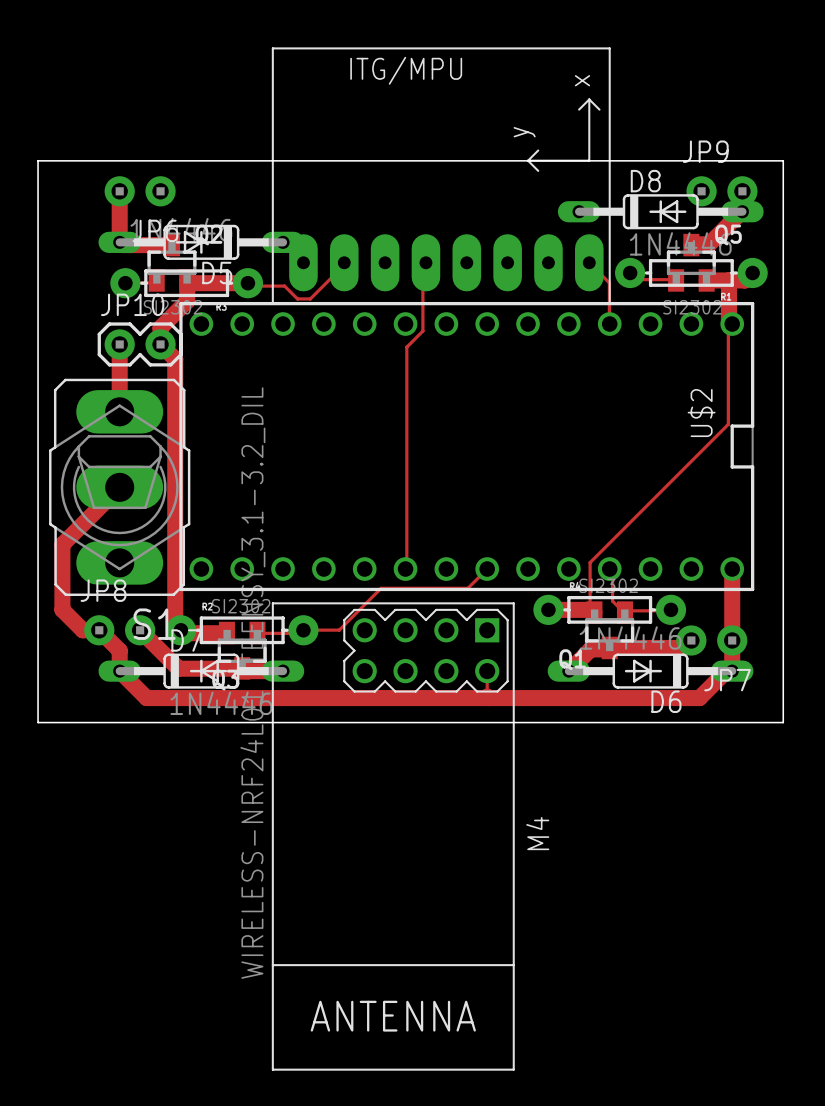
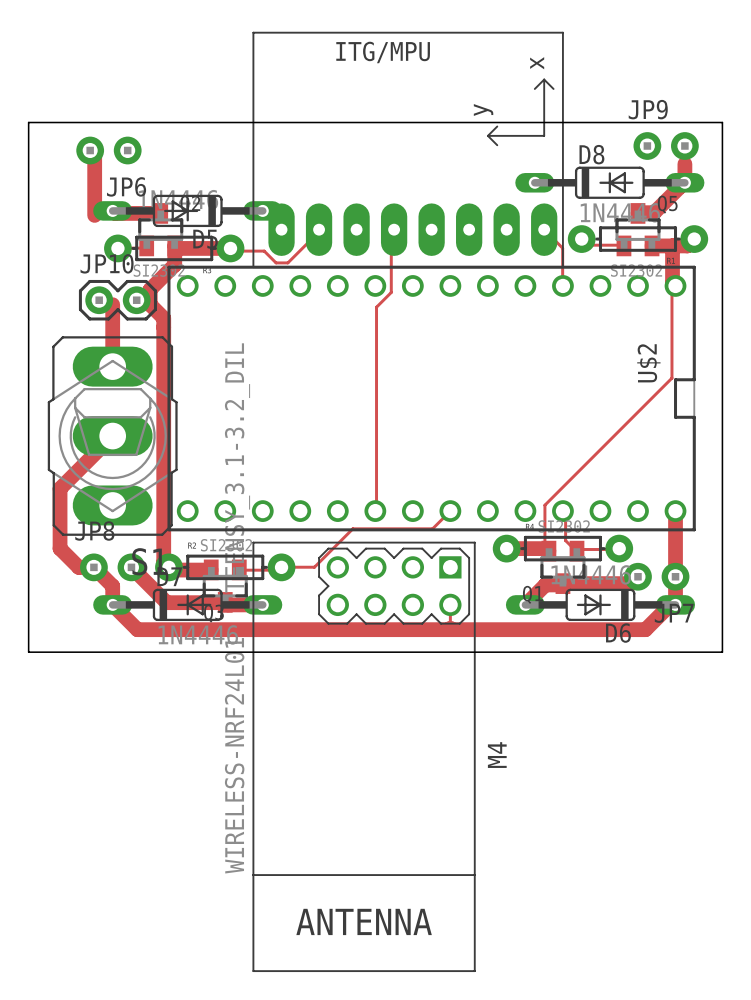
board edge: (783, 160) (38, 160) (38, 722) -> (722, 136) (722, 122) (28, 122) (28, 652) (37, 652)
track: none -> (90, 150) (94, 155) (95, 214)
track: (119, 191) (119, 242) (120, 241) -> none
JP6 position: (140, 191) -> (108, 150)
JP9 position: (722, 191) -> (666, 146)
JP10 position: (140, 344) -> (117, 300)

